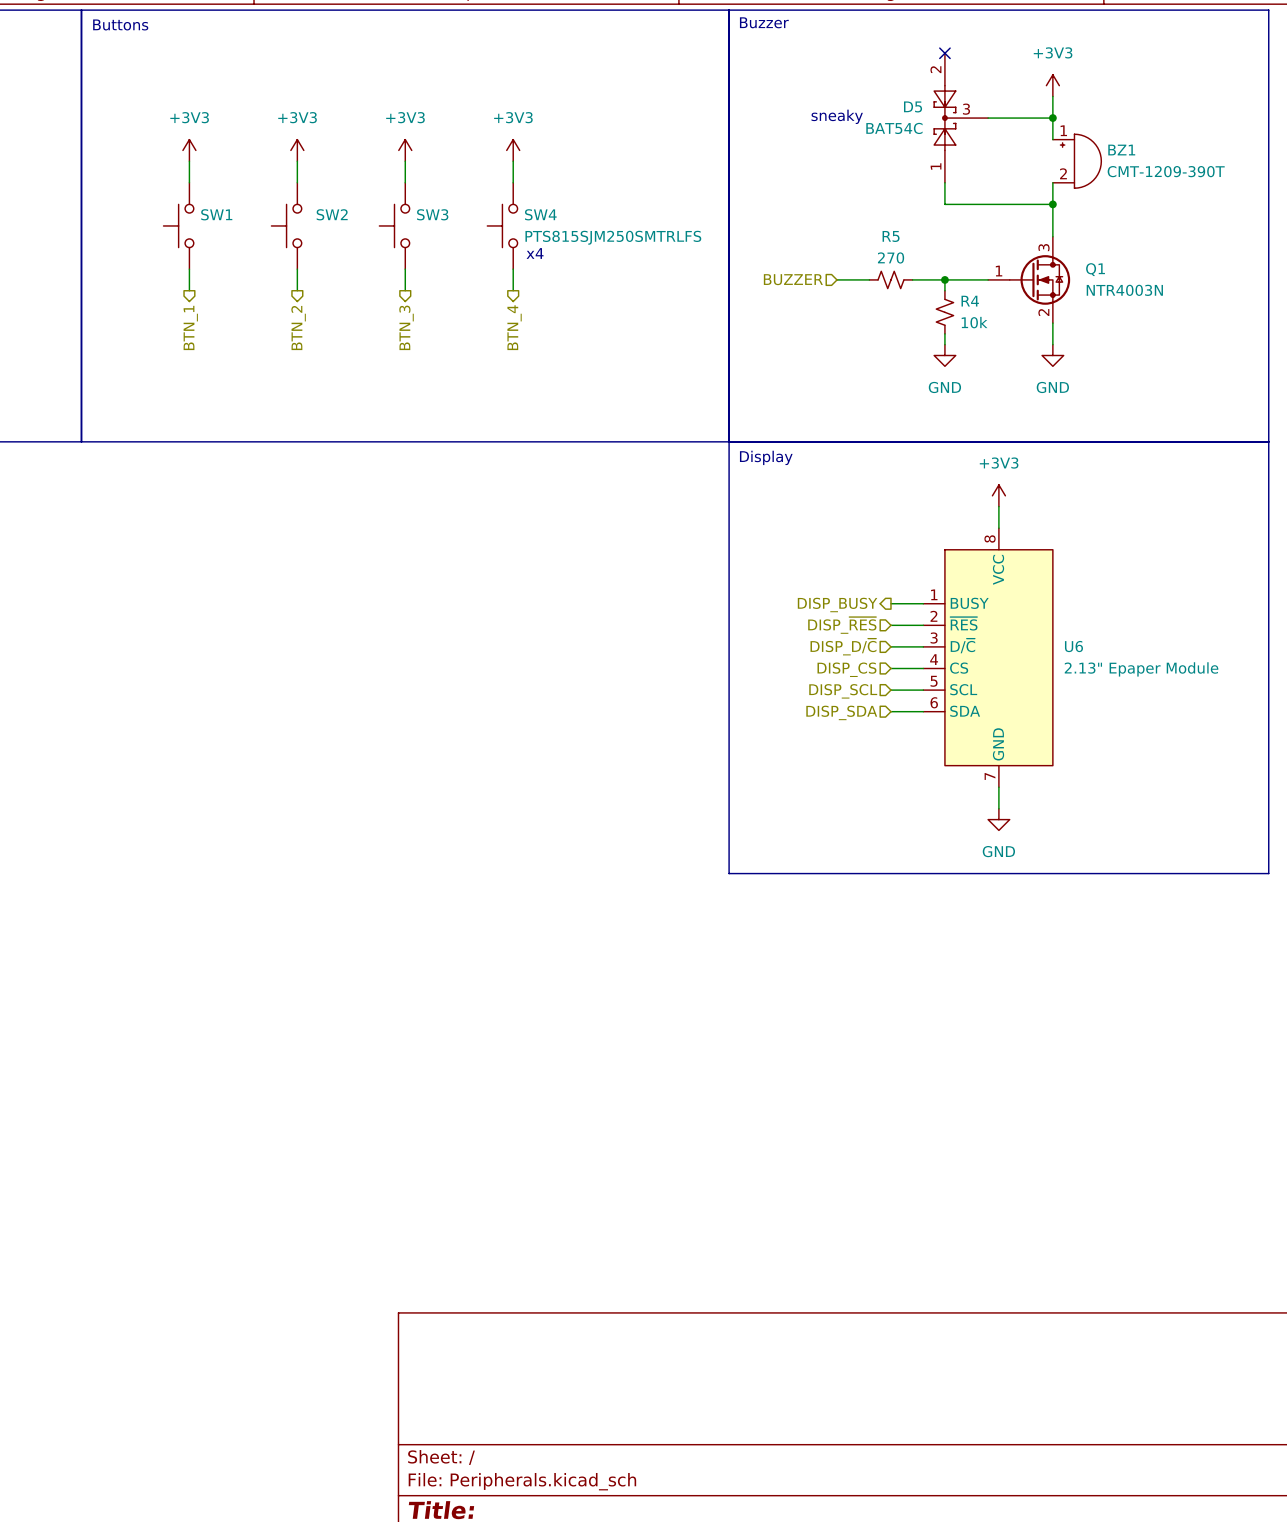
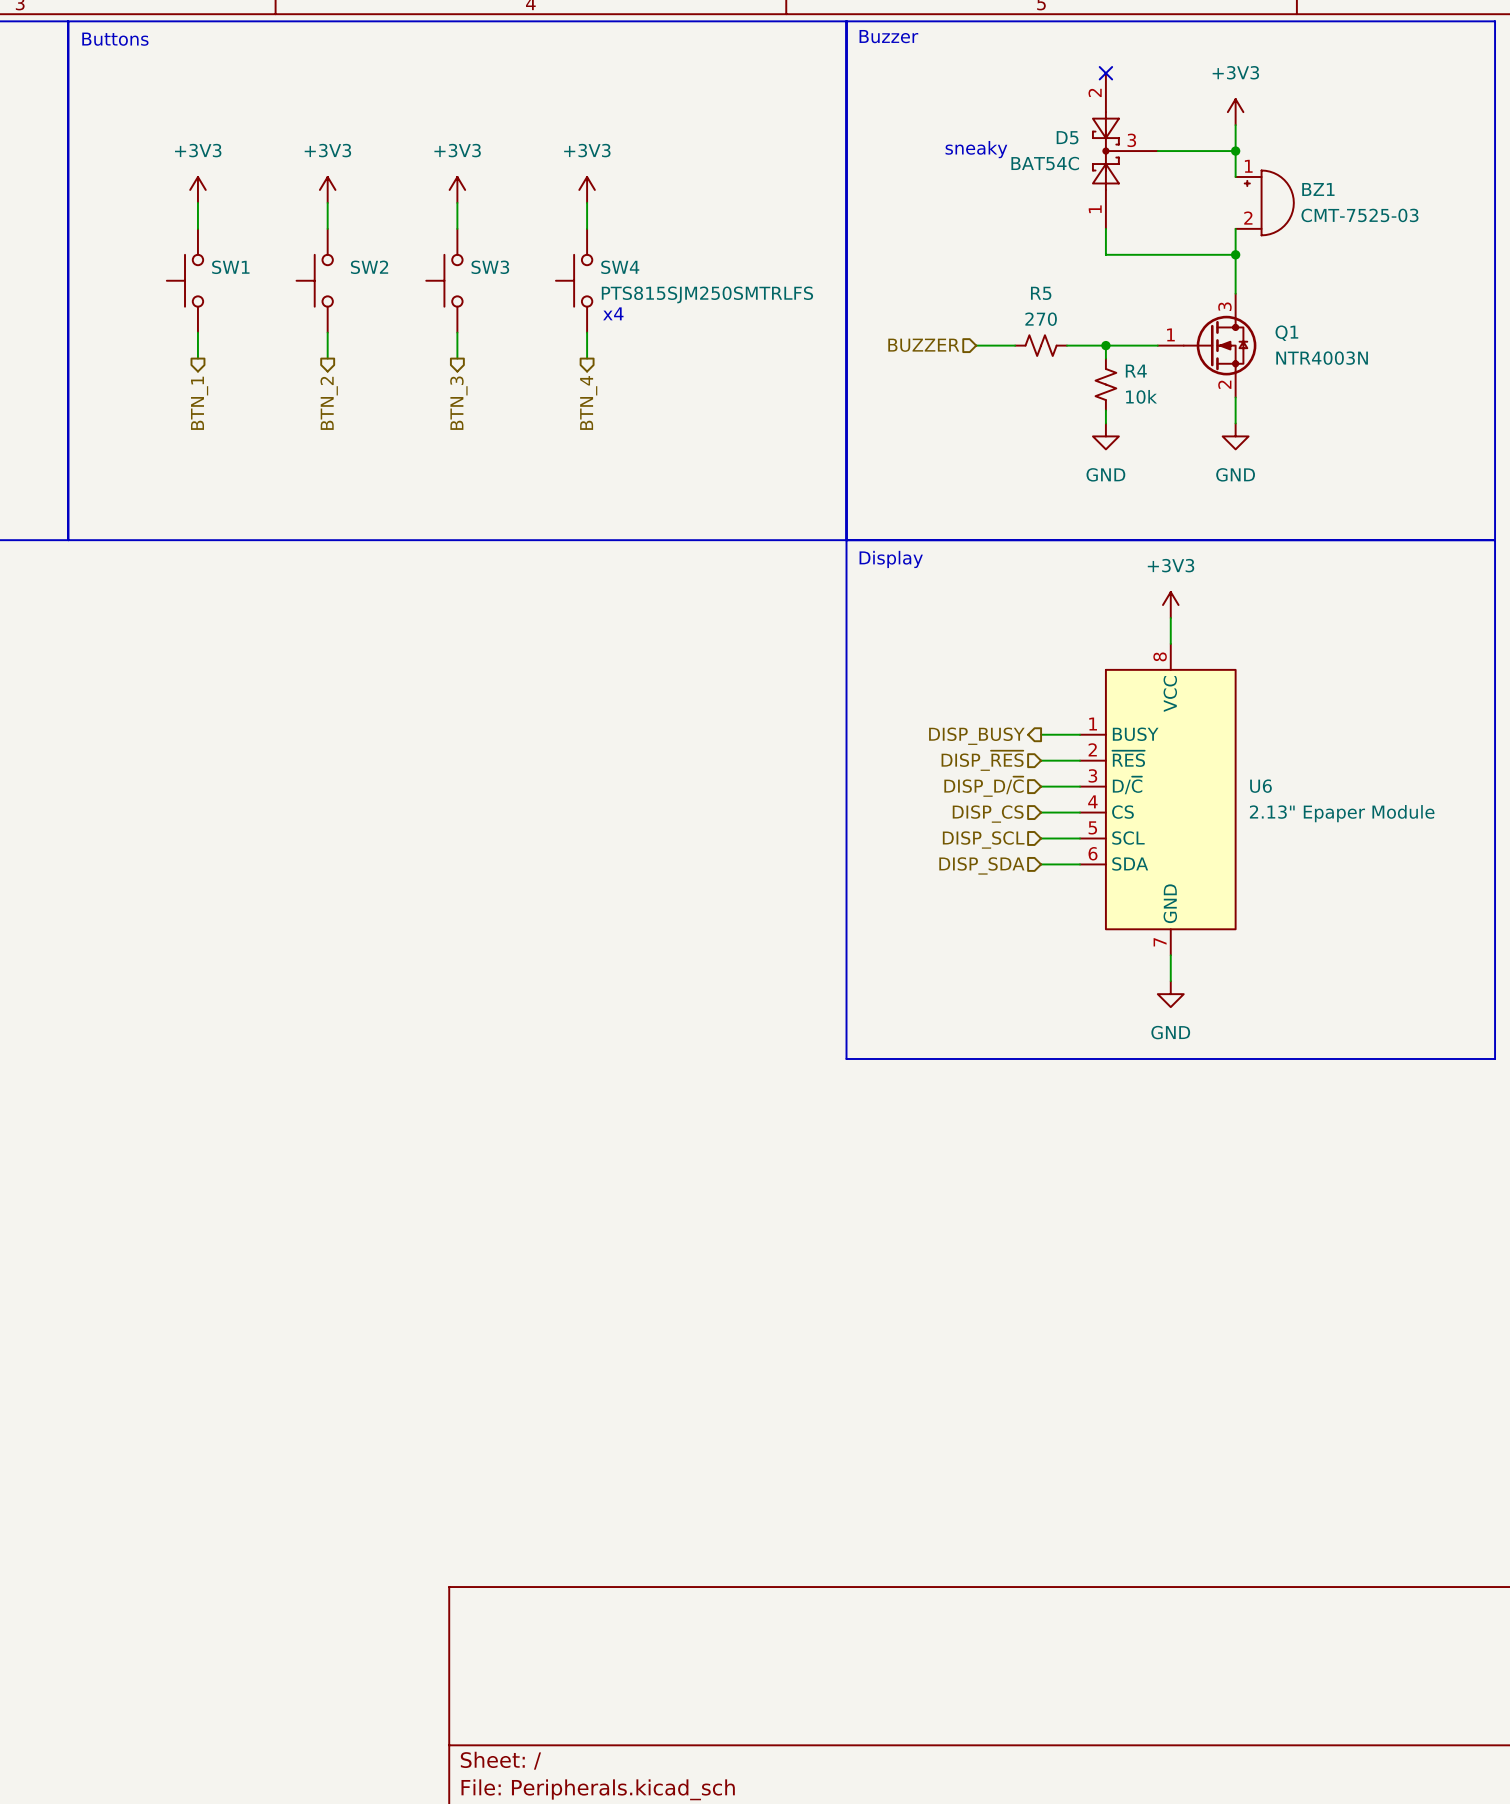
BZ1 value: CMT-1209-390T (1166, 171) -> CMT-7525-03 (1359, 215)

